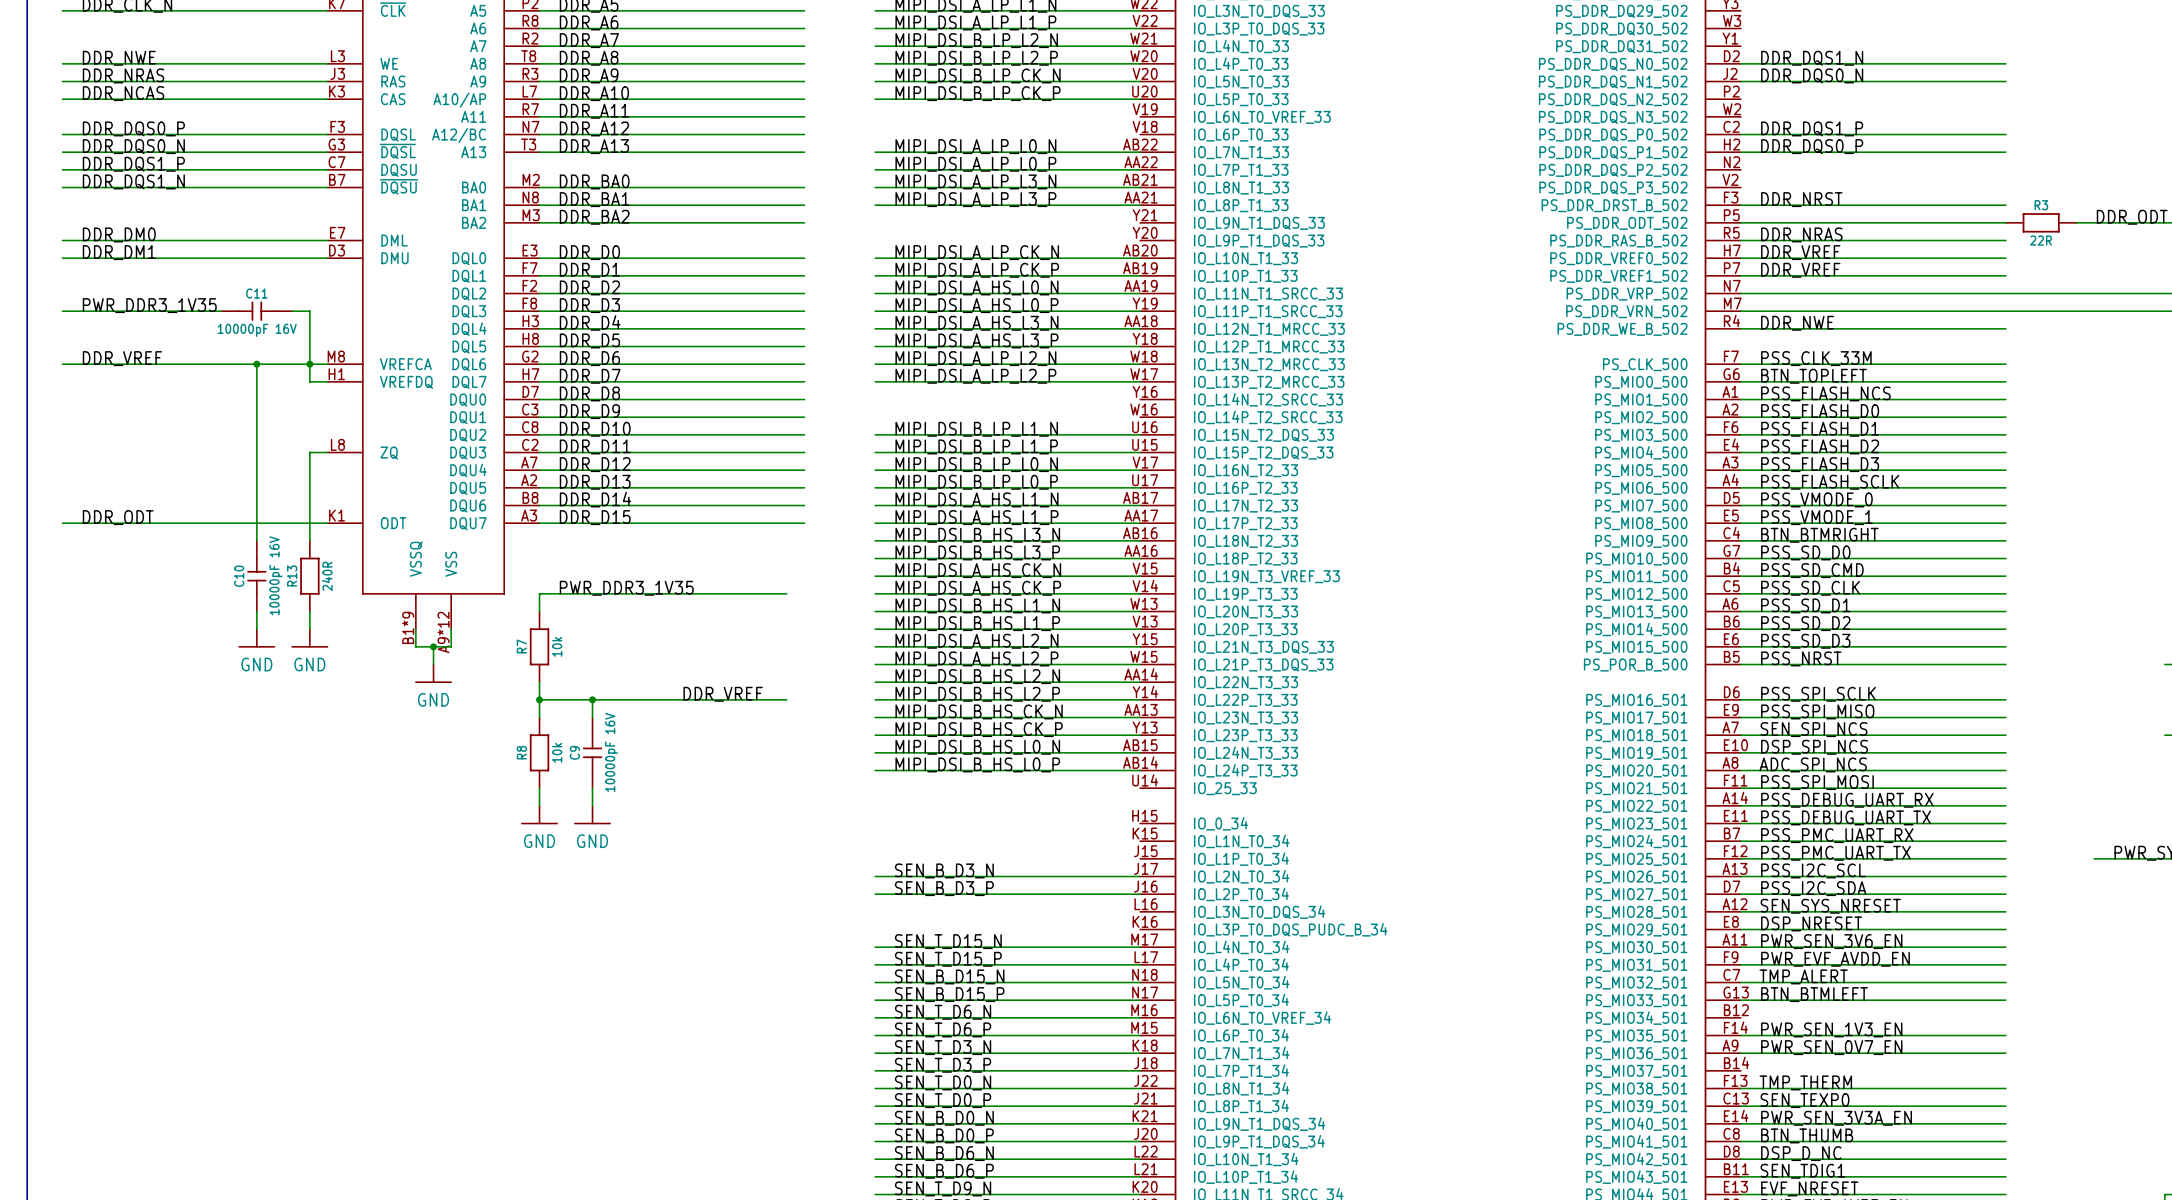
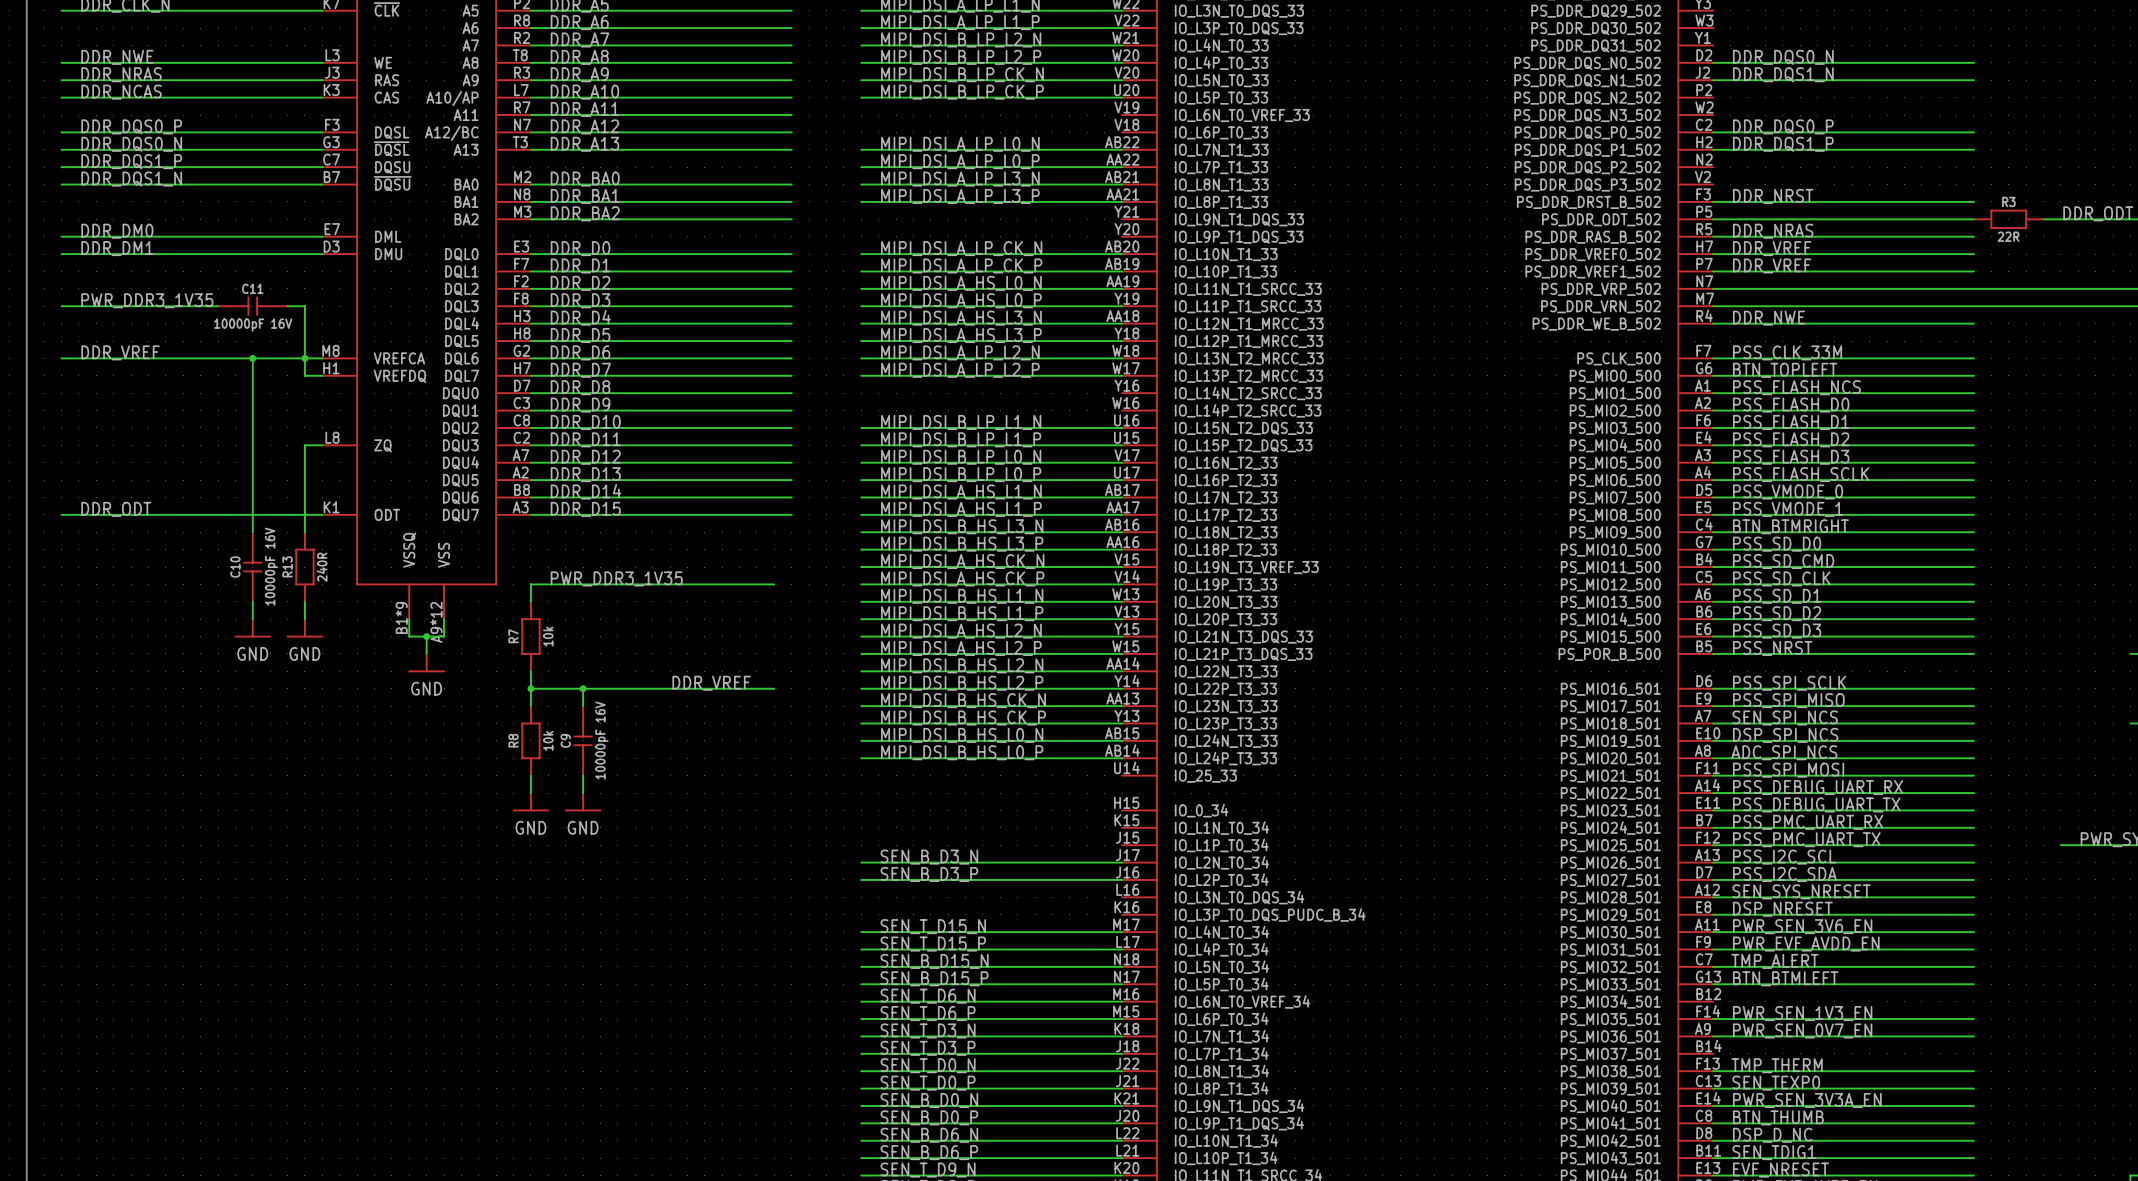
label: DDR_DQS1_N (1812, 58) -> DDR_DQS0_N (1783, 57)
label: DDR_DQS0_N (1812, 75) -> DDR_DQS1_N (1783, 74)
label: DDR_DQS1_P (1812, 128) -> DDR_DQS0_P (1783, 126)
label: DDR_DQS0_P (1812, 146) -> DDR_DQS1_P (1783, 144)

